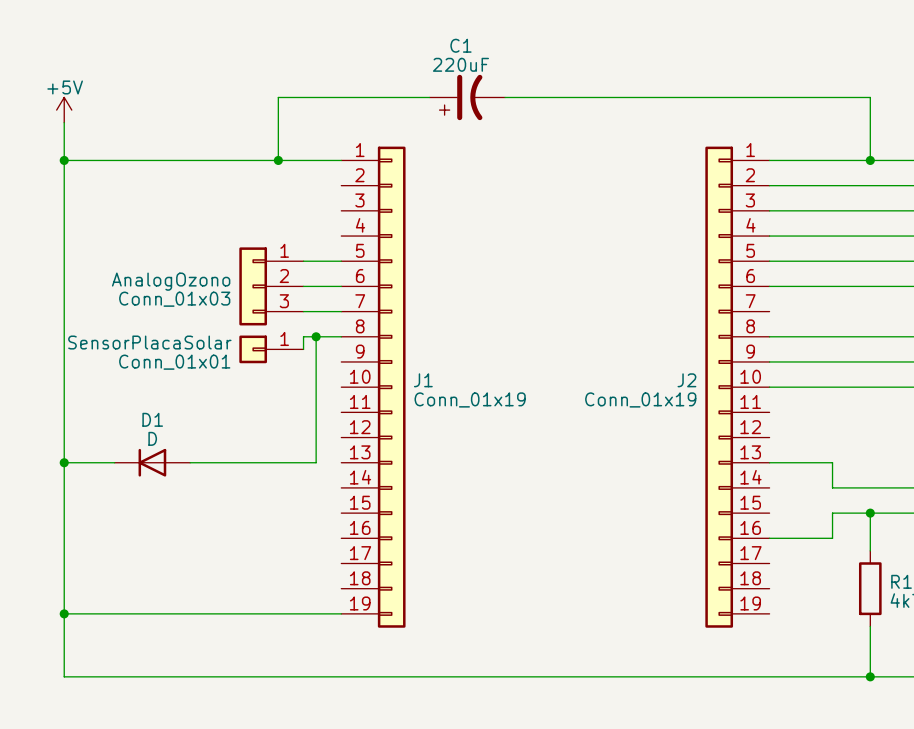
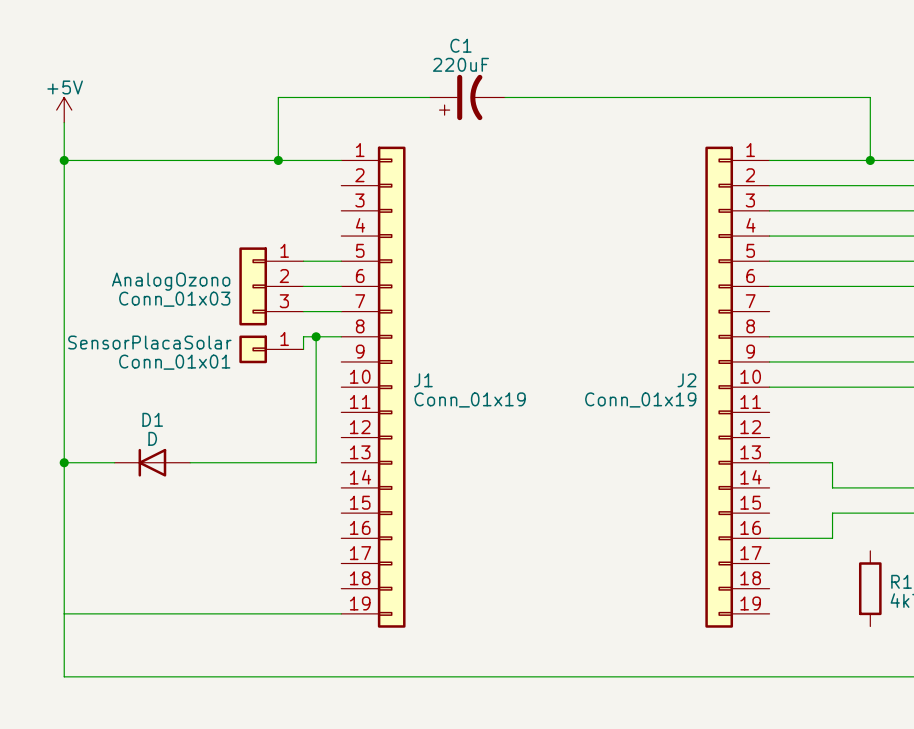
wire: (870, 513) (870, 550) -> none
junction: (870, 513) -> none
junction: (64, 613) -> none
wire: (870, 626) (870, 676) -> none
junction: (870, 676) -> none

